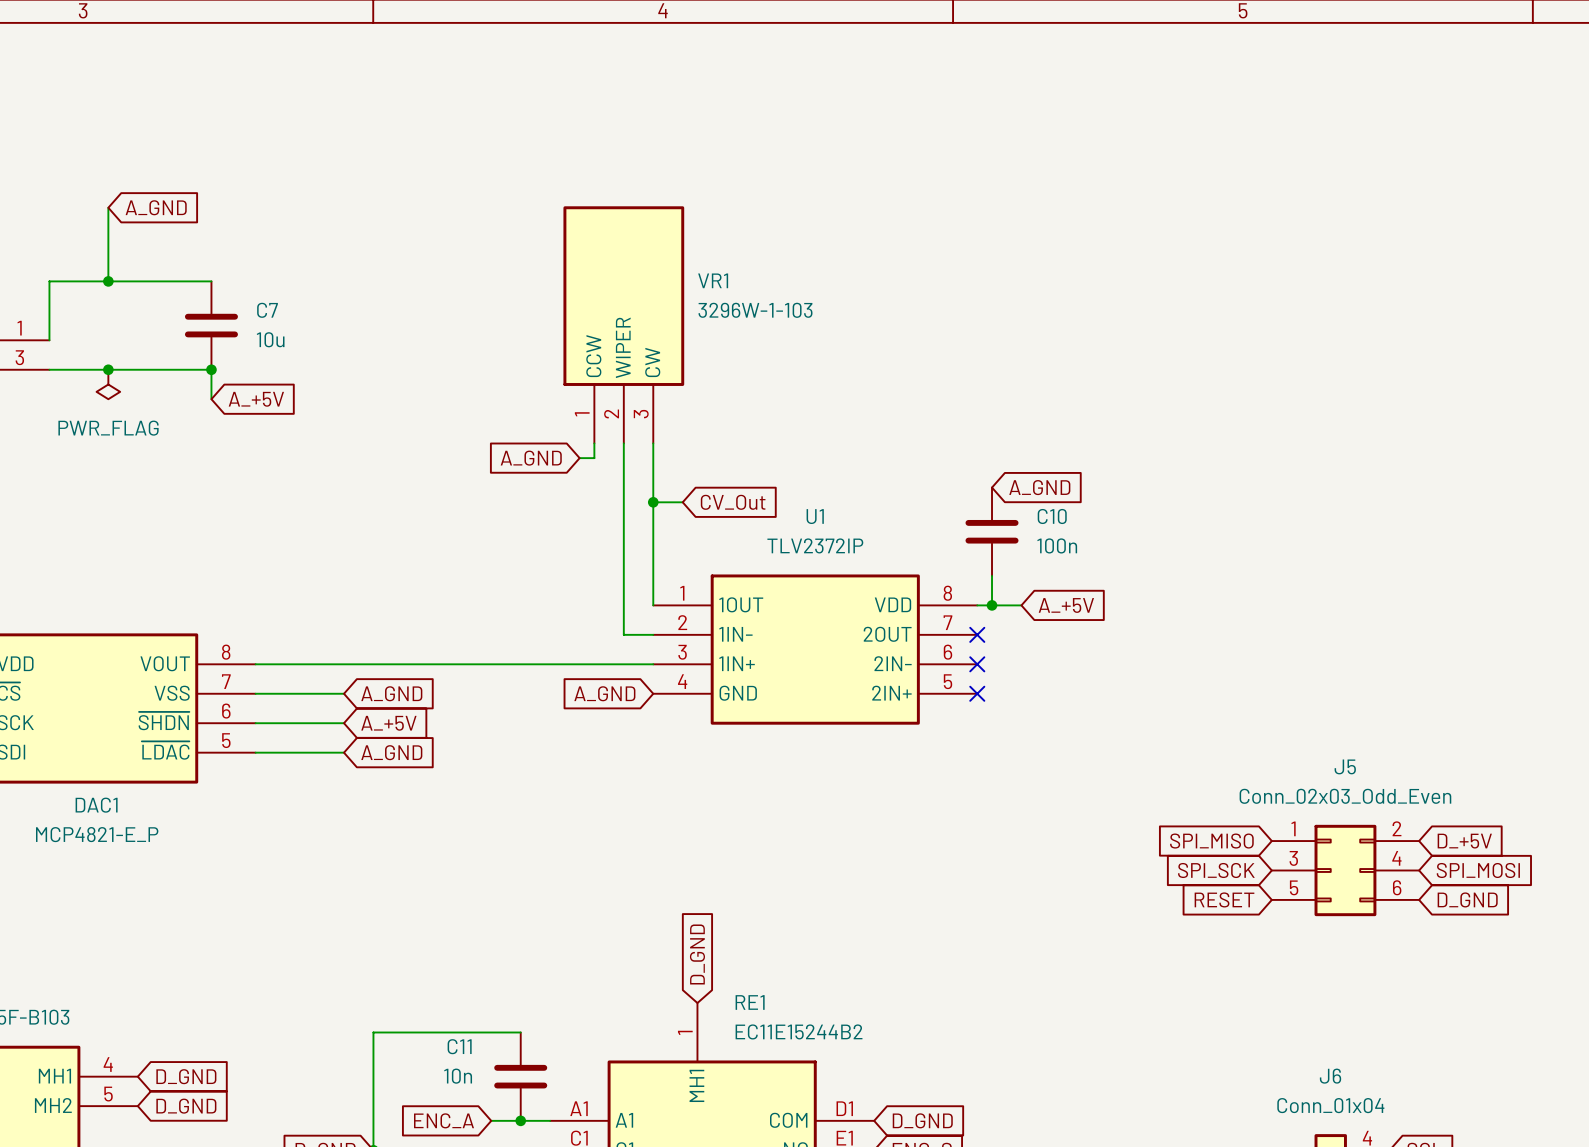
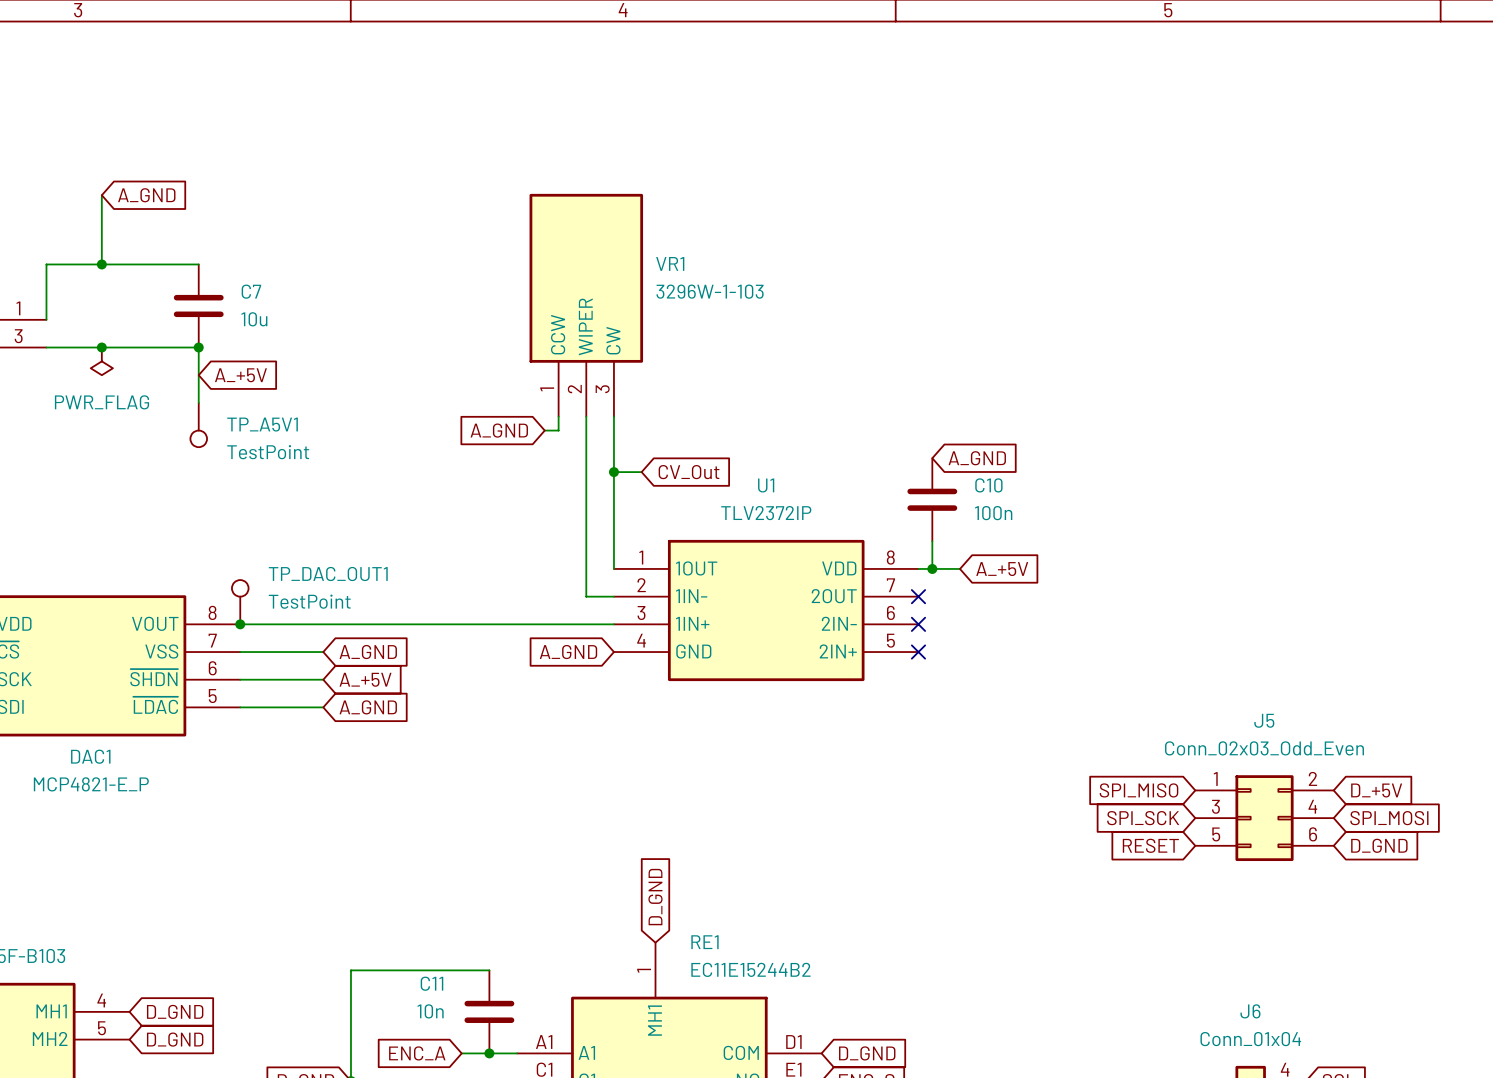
wire: none -> (198, 375) (198, 402)
TP_A5V1: none -> TestPoint (198, 425)
TP_DAC_OUT1: none -> TestPoint (240, 602)
junction: none -> (240, 624)

